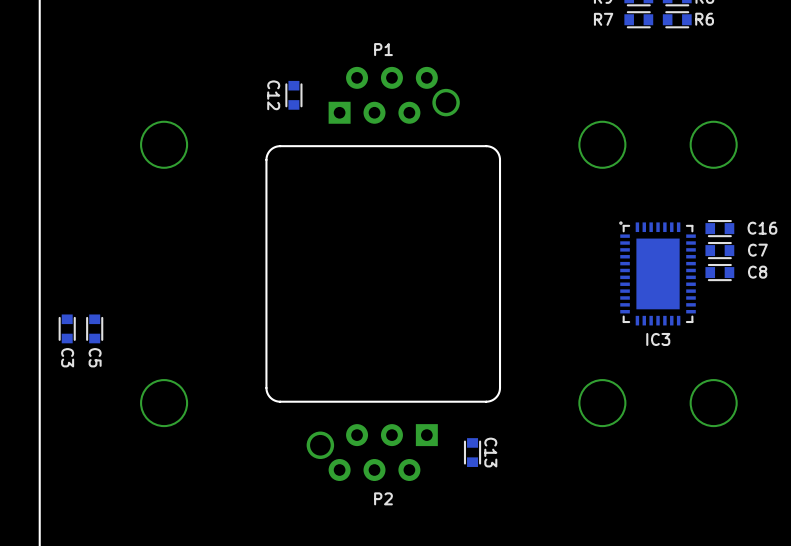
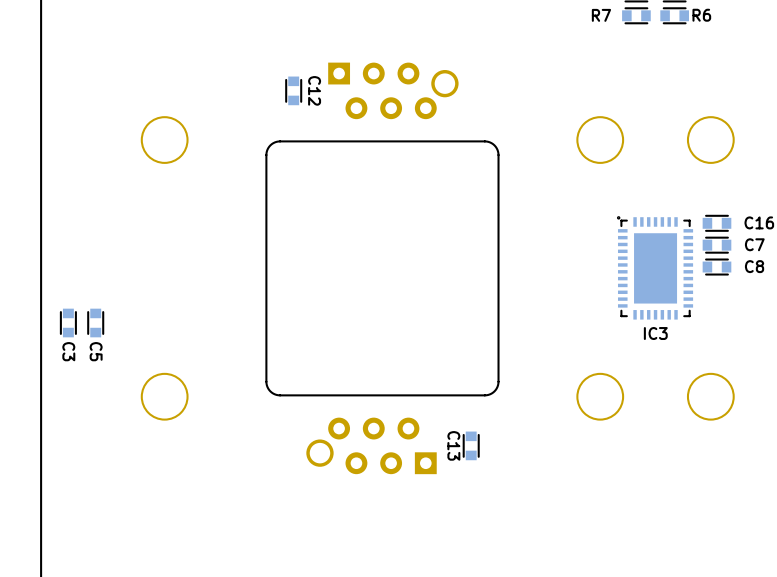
C12 name position: C12 (273, 95) -> C12 (314, 90)
P1 side: bottom (394, 95) -> top (393, 90)
P2 side: bottom (372, 452) -> top (371, 445)
C13 name position: C13 (490, 452) -> C13 (453, 445)

